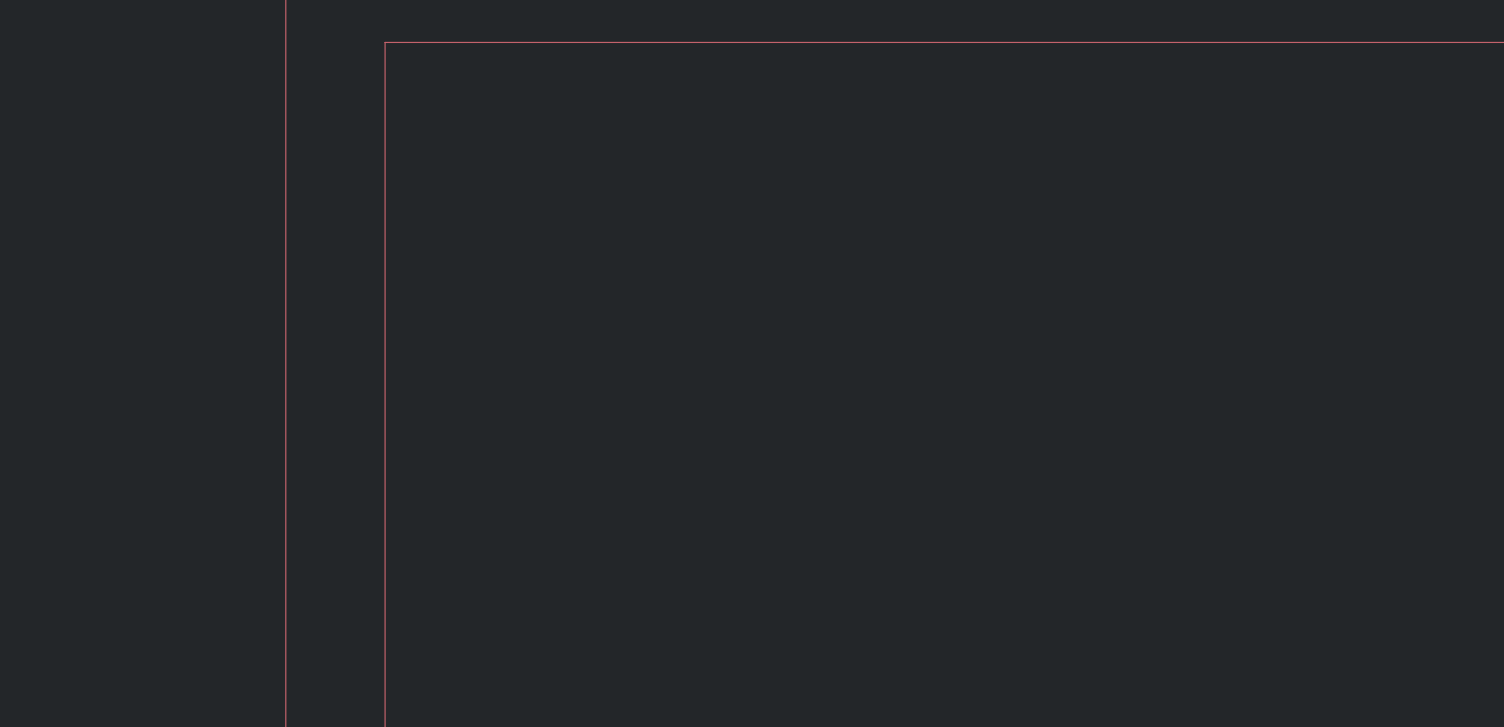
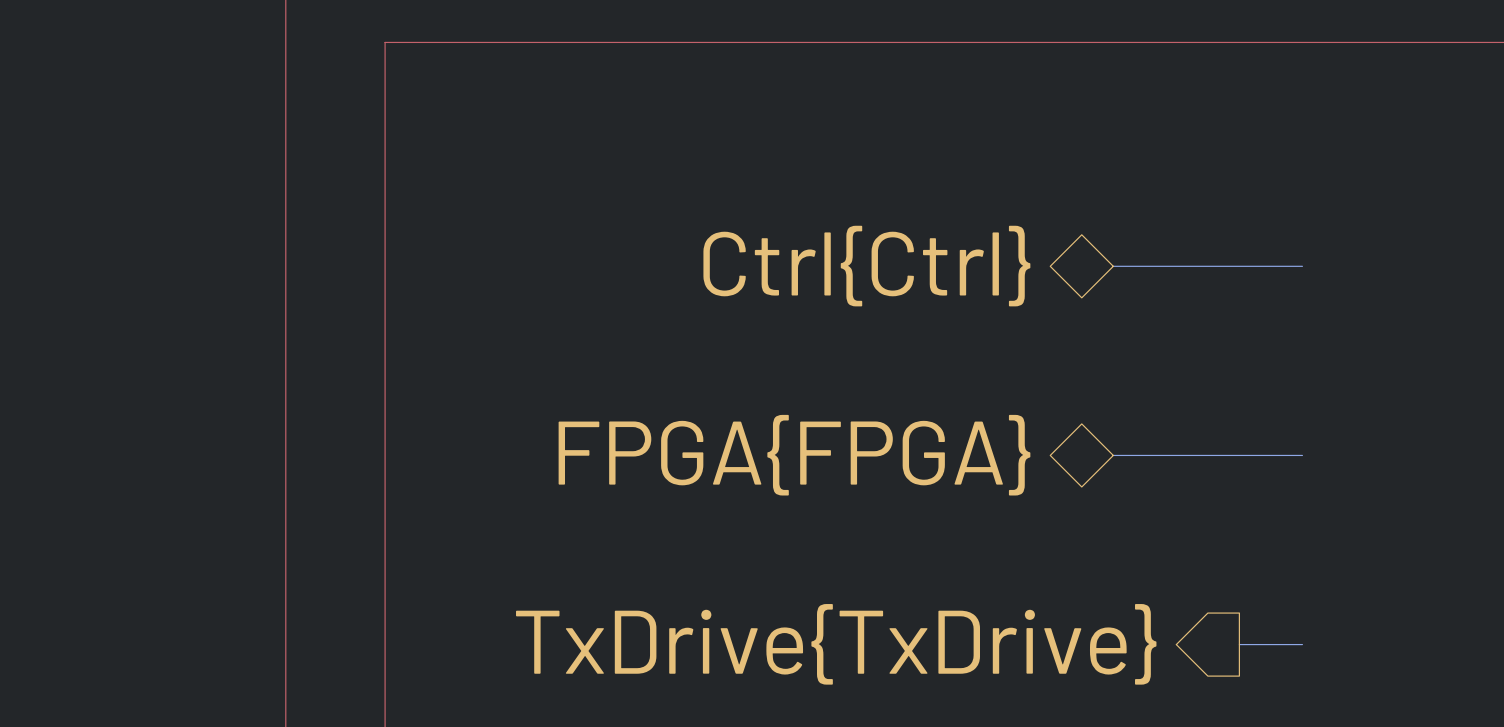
hierarchical label: none -> Ctrl{Ctrl} (866, 266)
bus: none -> (1113, 266) (1302, 266)
hierarchical label: none -> FPGA{FPGA} (794, 455)
bus: none -> (1113, 455) (1302, 455)
hierarchical label: none -> TxDrive{TxDrive} (836, 644)
bus: none -> (1239, 644) (1302, 644)

